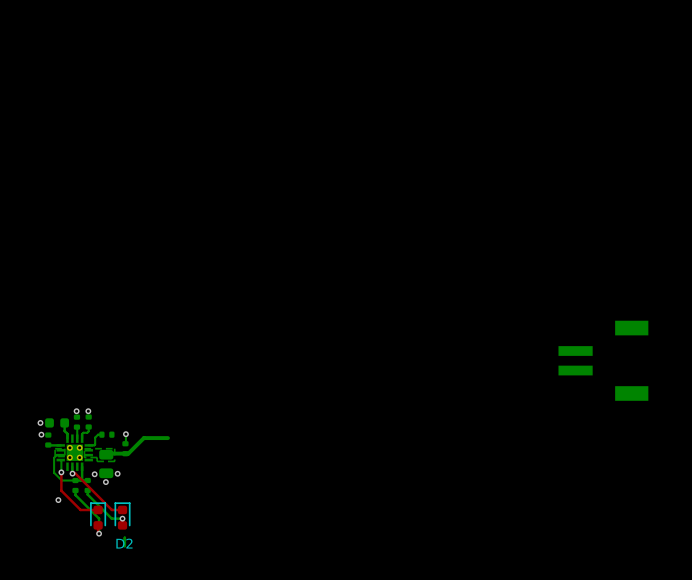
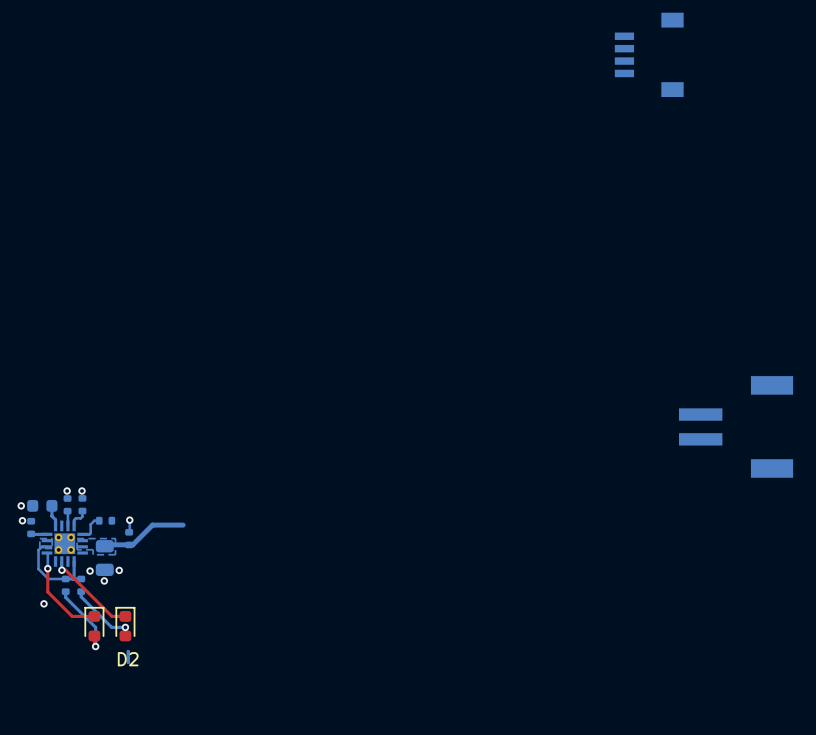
part: none -> (649, 54)

